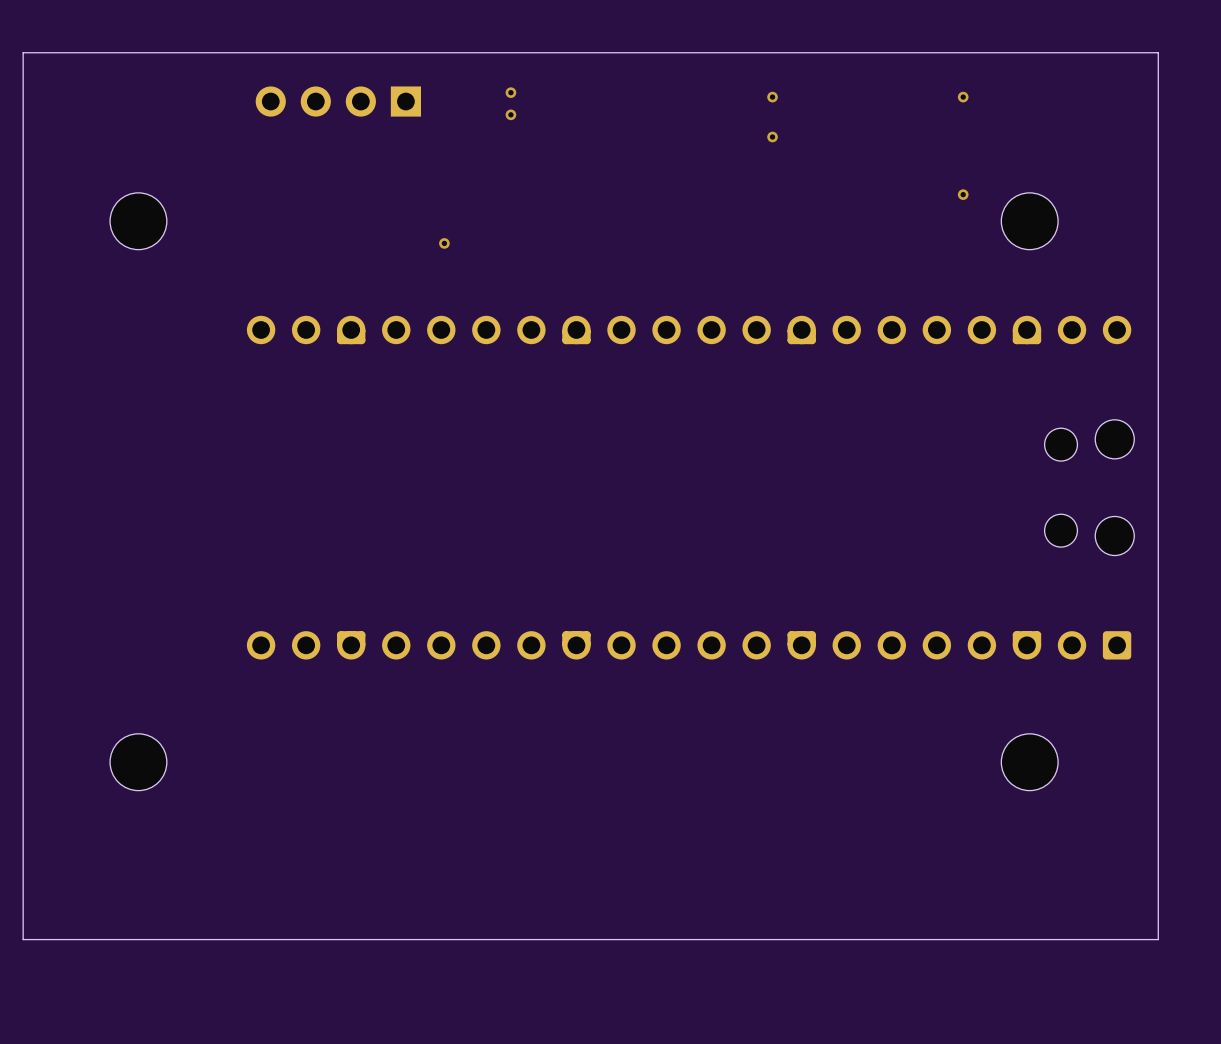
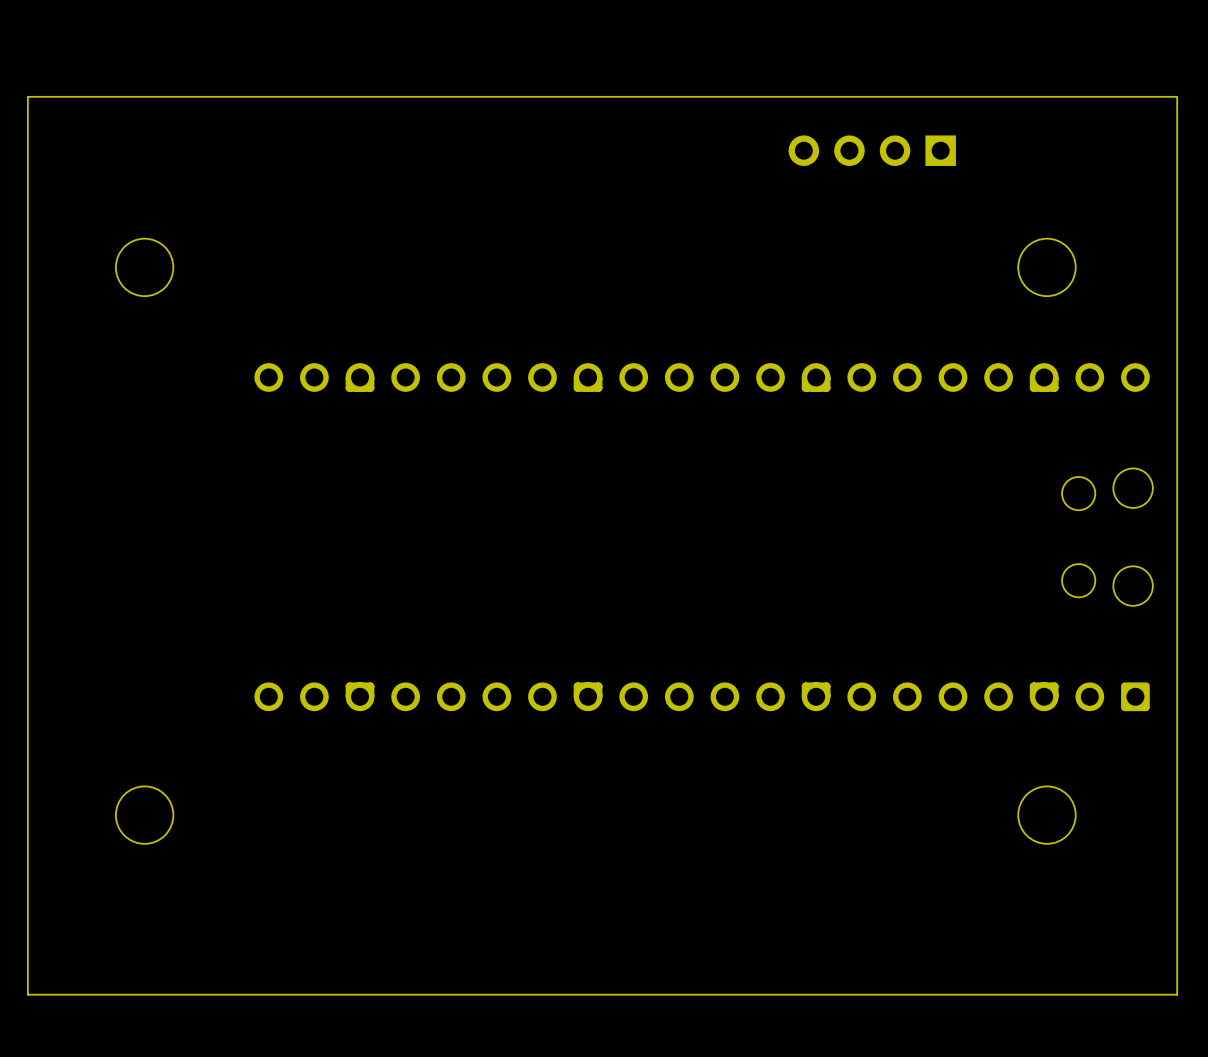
via: (510, 92) -> none
via: (772, 97) -> none
via: (963, 97) -> none
part: (338, 101) -> none
part: none -> (872, 150)
via: (510, 114) -> none
via: (772, 137) -> none
via: (963, 194) -> none
via: (444, 243) -> none

